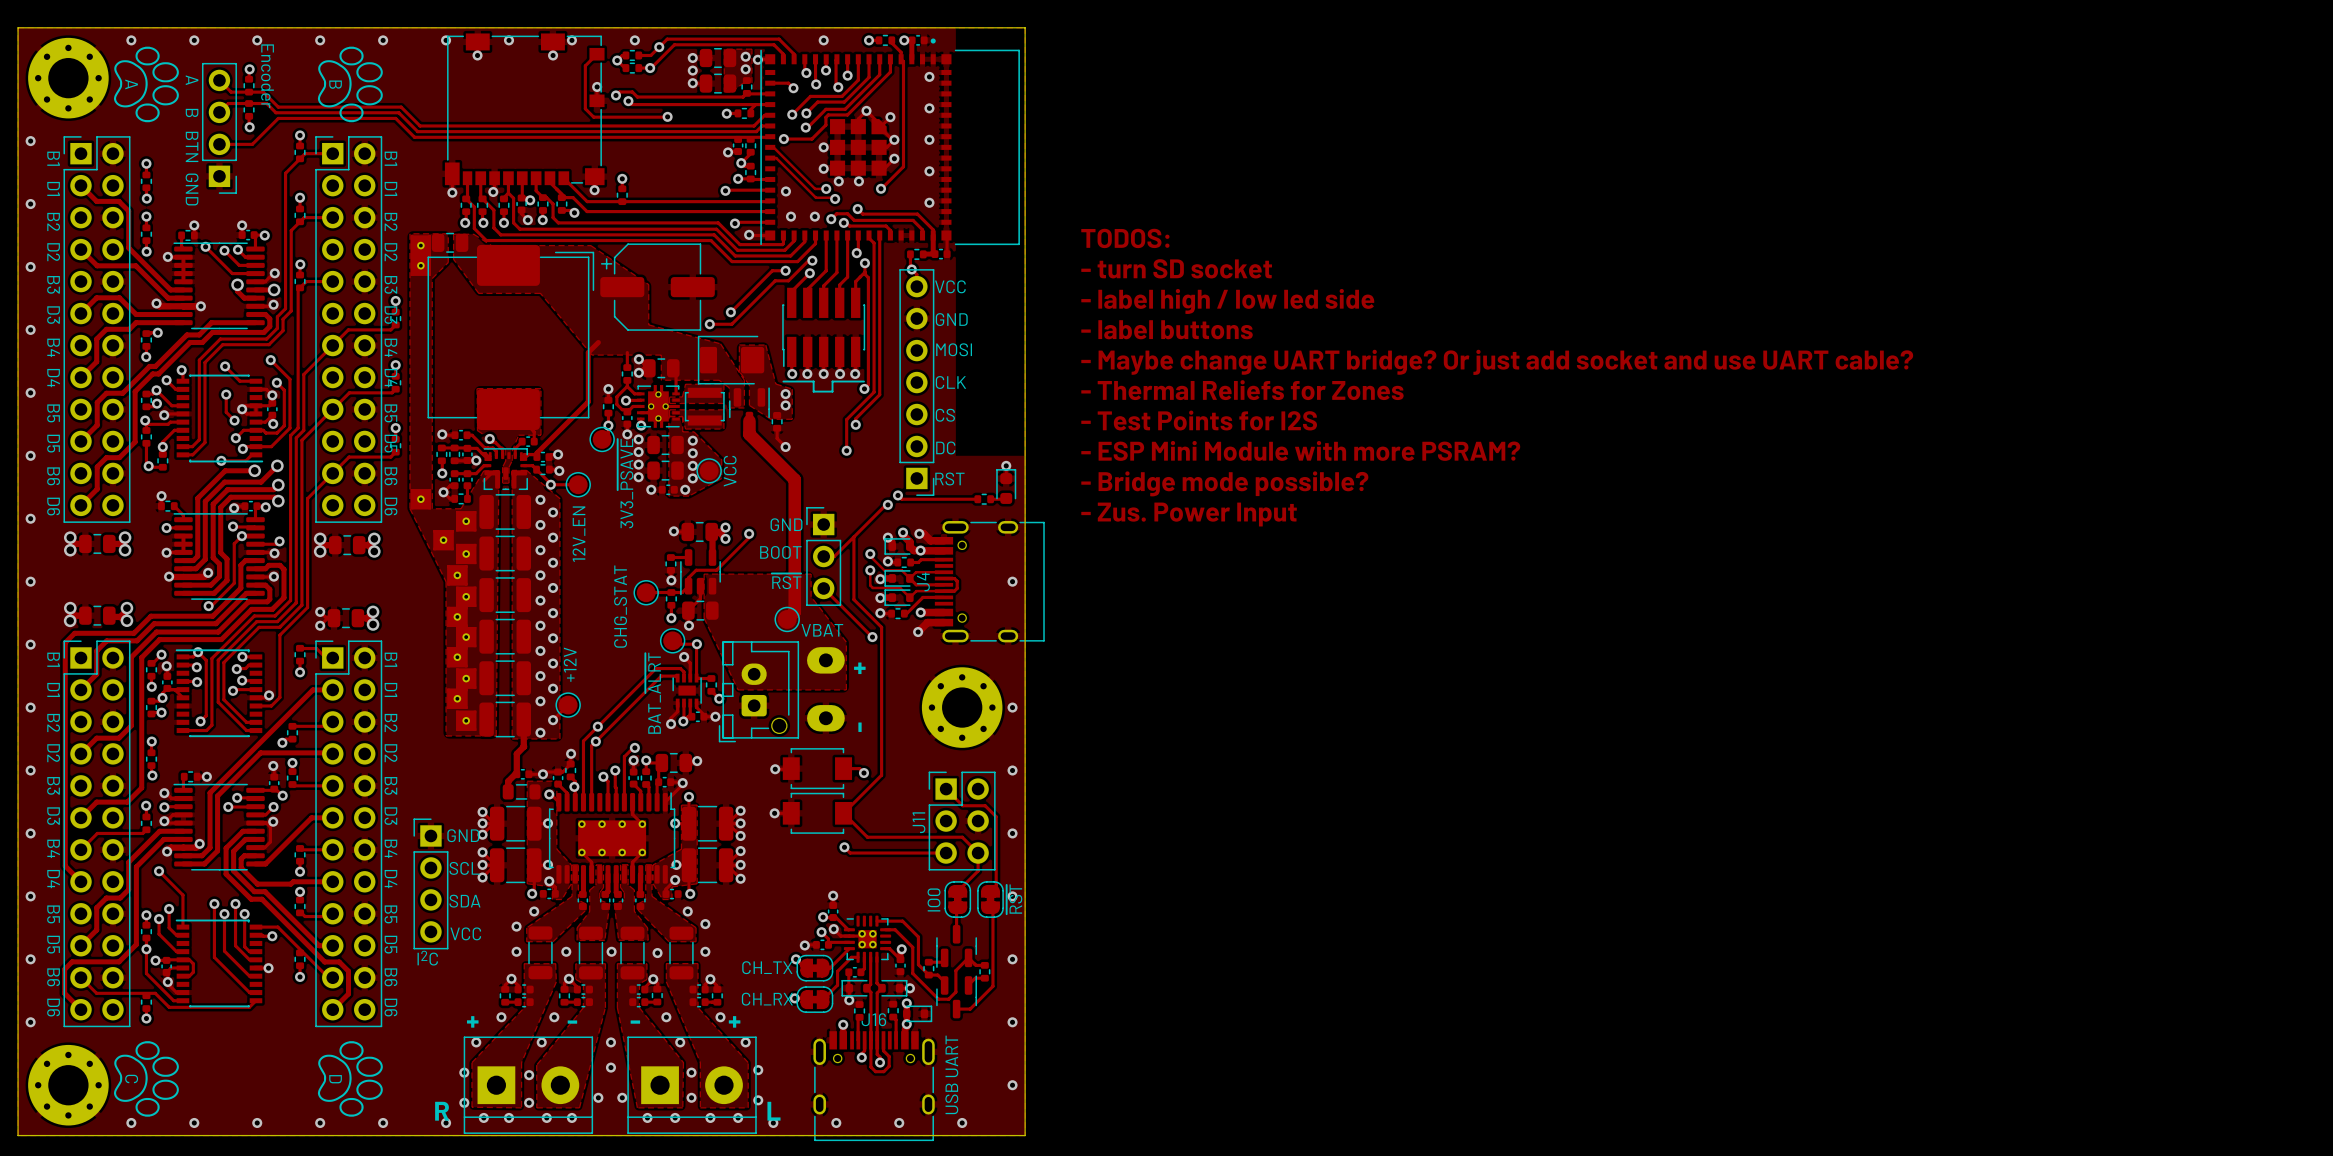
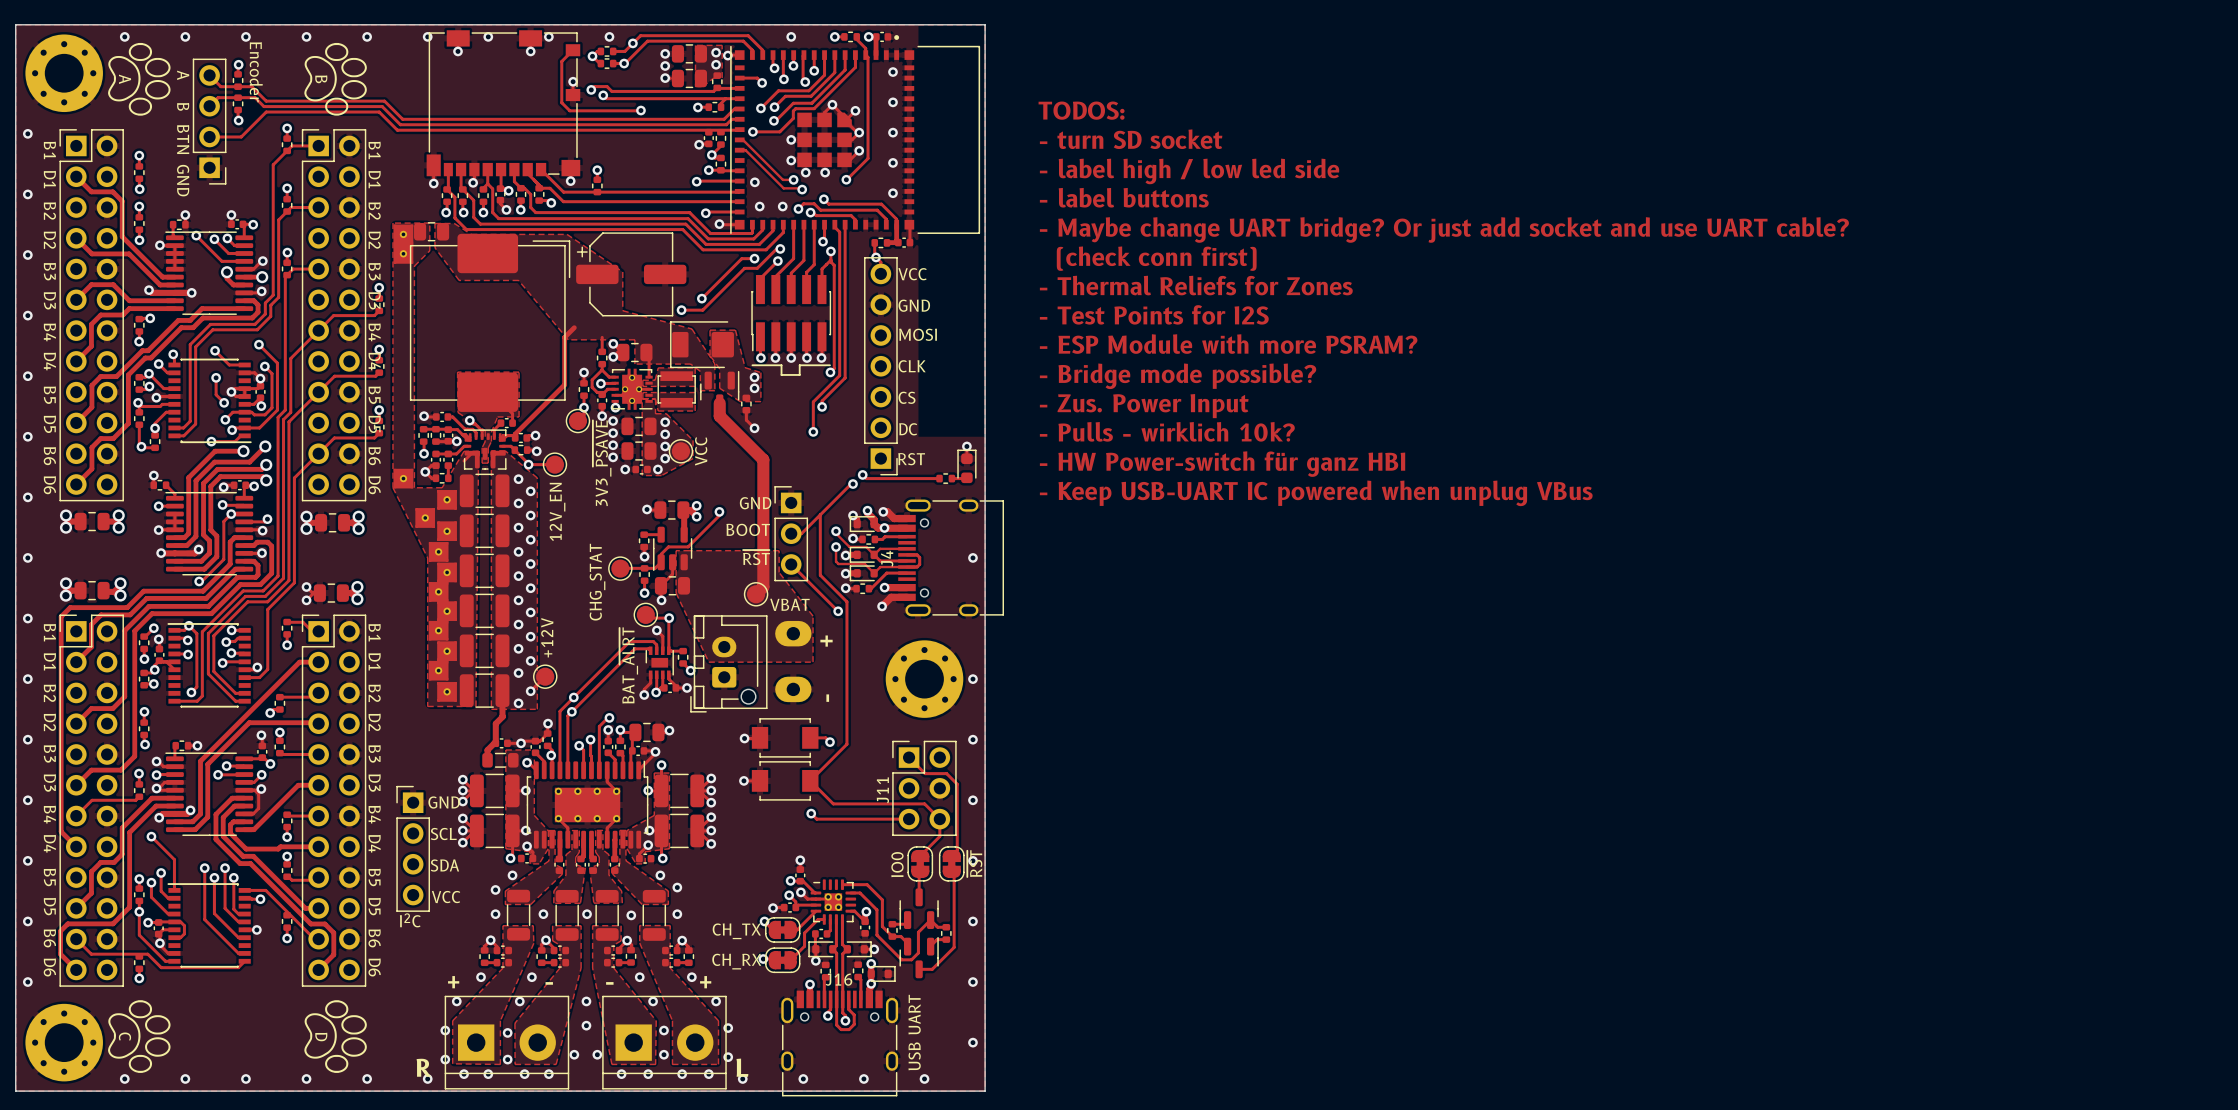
text: none -> TODOS: (1081, 110)
text: none -> - turn SD socket (1131, 139)
text: none -> - label high / low led side (1189, 171)
text: none -> - label buttons (1124, 197)
text: TODOS: (1125, 238) -> - Maybe change UART bridge? Or just add socket and use UART cable? (1444, 229)
text: - turn SD socket (1176, 268) -> (check conn first) (1156, 258)
text: - label high / low led side (1227, 301) -> - Thermal Reliefs for Zones (1196, 285)
text: - label buttons (1167, 329) -> - Test Points for I2S (1154, 314)
text: - Maybe change UART bridge? Or just add socket and use UART cable? (1497, 362) -> - ESP Module with more PSRAM? (1228, 344)
text: - Thermal Reliefs for Zones (1242, 390) -> - Bridge mode possible? (1178, 376)
text: - Test Points for I2S (1199, 420) -> - Zus. Power Input (1144, 406)
text: - ESP Mini Module with more PSRAM? (1300, 450) -> - Pulls - wirklich 10k? (1167, 431)
text: - Bridge mode possible? (1224, 483) -> - HW Power-switch für ganz HBI (1222, 464)
text: - Zus. Power Input (1189, 514) -> - Keep USB-UART IC powered when unplug VBus (1316, 493)

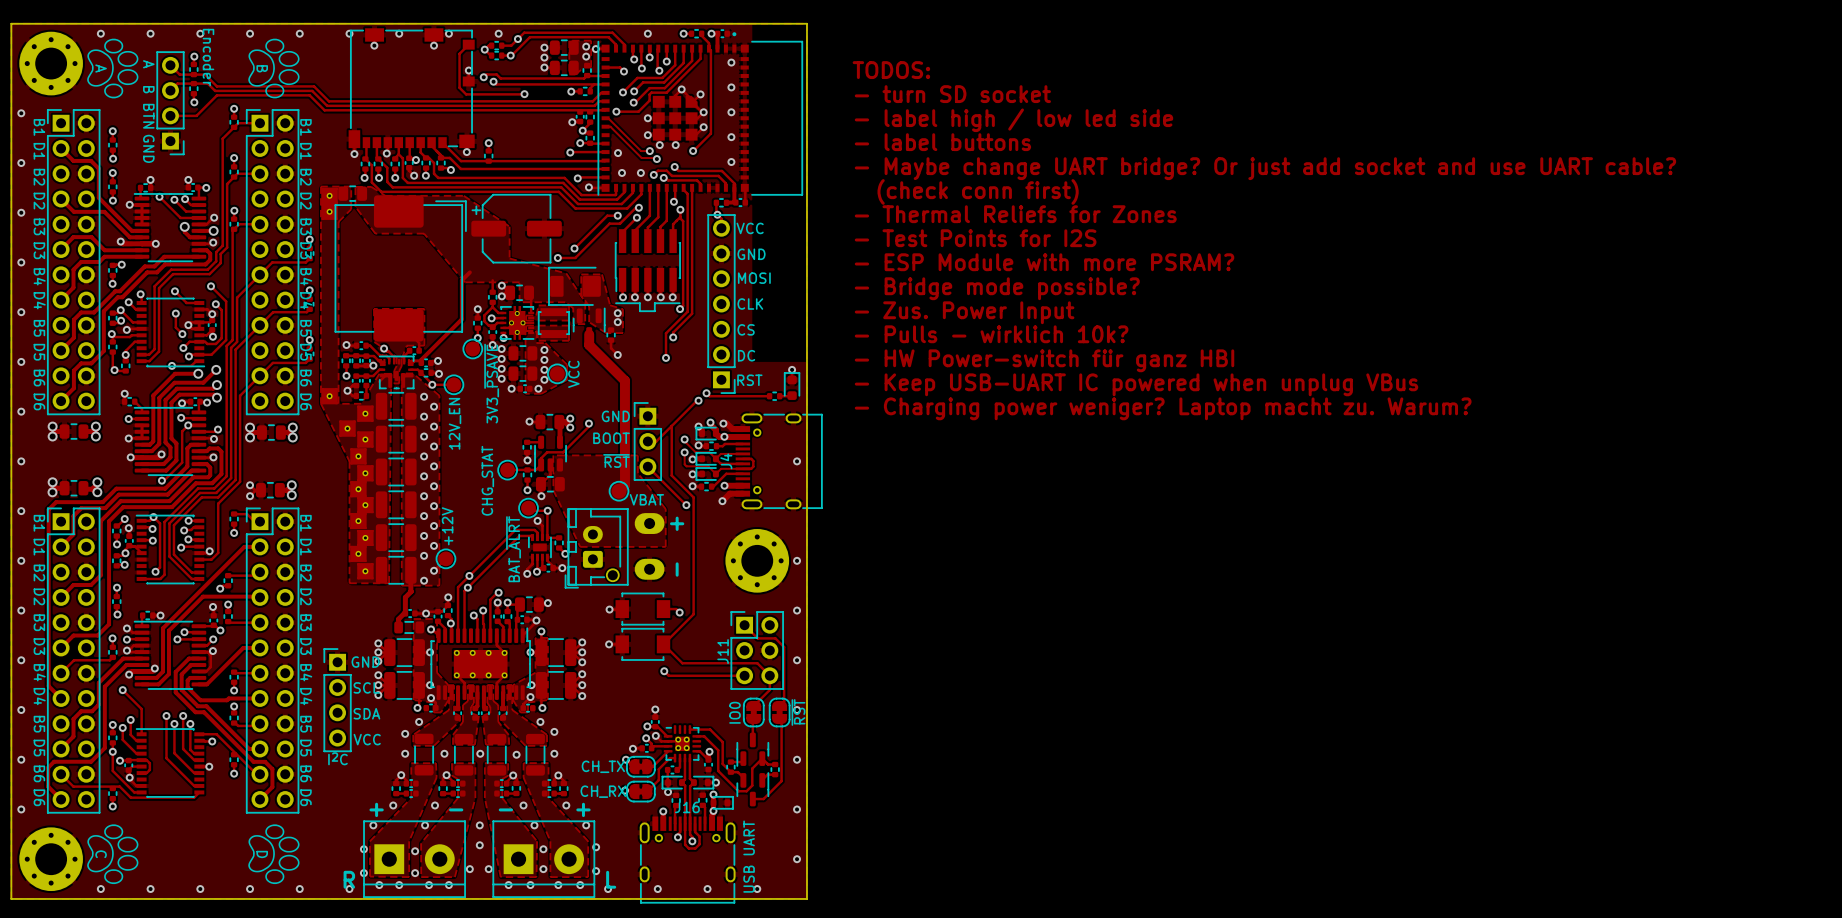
text: none -> TODOS: (891, 70)
text: TODOS: (1081, 110) -> - turn SD socket (952, 94)
text: - turn SD socket (1131, 139) -> - label high / low led side (1013, 120)
text: - label high / low led side (1189, 171) -> - label buttons (942, 142)
text: - label buttons (1124, 197) -> - Maybe change UART bridge? Or just add socket and use UART cable? (1265, 168)
text: - Maybe change UART bridge? Or just add socket and use UART cable? (1444, 229) -> (check conn first) (978, 191)
text: (check conn first) (1156, 258) -> - Thermal Reliefs for Zones (1015, 214)
text: - Thermal Reliefs for Zones (1196, 285) -> - Test Points for I2S (975, 238)
text: - Test Points for I2S (1154, 314) -> - ESP Module with more PSRAM? (1044, 262)
text: - ESP Module with more PSRAM? (1228, 344) -> - Bridge mode possible? (997, 288)
text: - Bridge mode possible? (1178, 376) -> - Zus. Power Input (964, 312)
text: - Zus. Power Input (1144, 406) -> - Pulls - wirklich 10k? (991, 334)
text: - Pulls - wirklich 10k? (1167, 431) -> - HW Power-switch für ganz HBI (1044, 360)
text: - HW Power-switch für ganz HBI (1222, 464) -> - Keep USB-UART IC powered when unplug VBus (1136, 384)
text: - Keep USB-UART IC powered when unplug VBus (1316, 493) -> - Charging power weniger? Laptop macht zu. Warum? (1163, 408)

